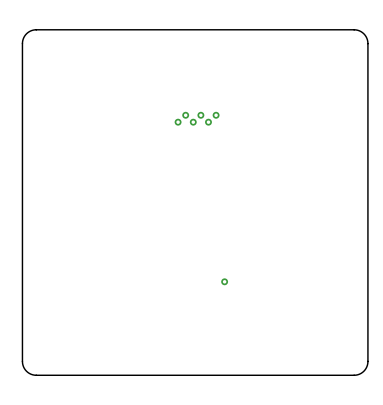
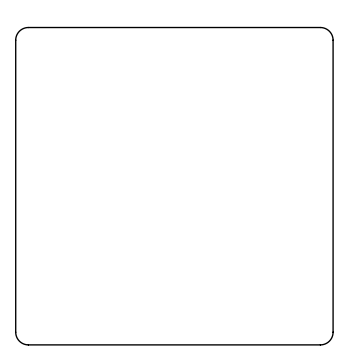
via: (185, 115) -> none
via: (200, 115) -> none
via: (216, 115) -> none
via: (178, 122) -> none
via: (193, 122) -> none
via: (208, 122) -> none
via: (224, 281) -> none

